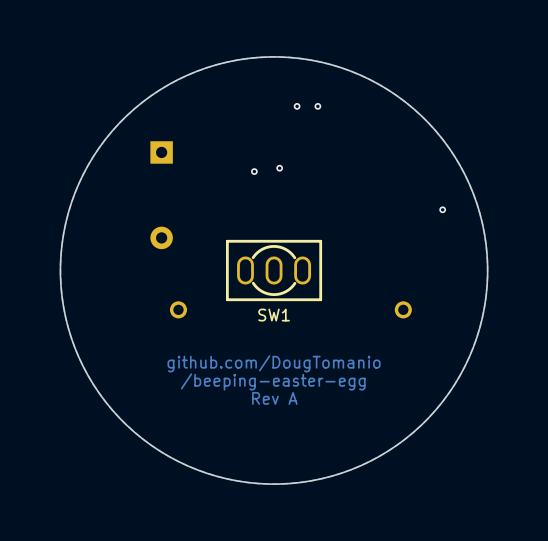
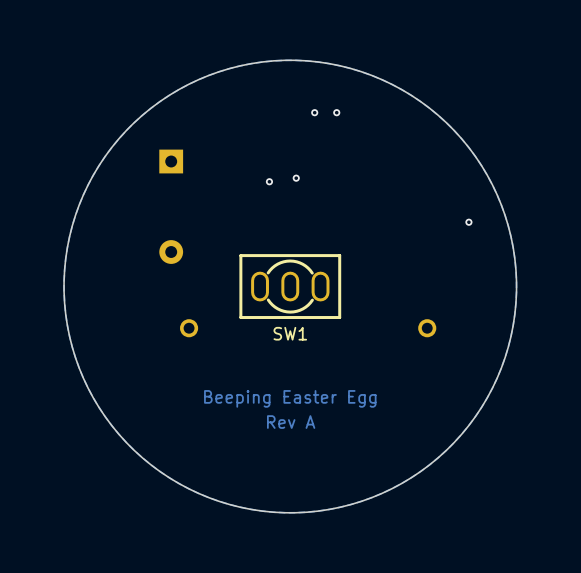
text: github.com/DougTomanio (274, 363) -> none
text: /beeping-easter-egg (273, 381) -> Beeping Easter Egg (290, 398)

